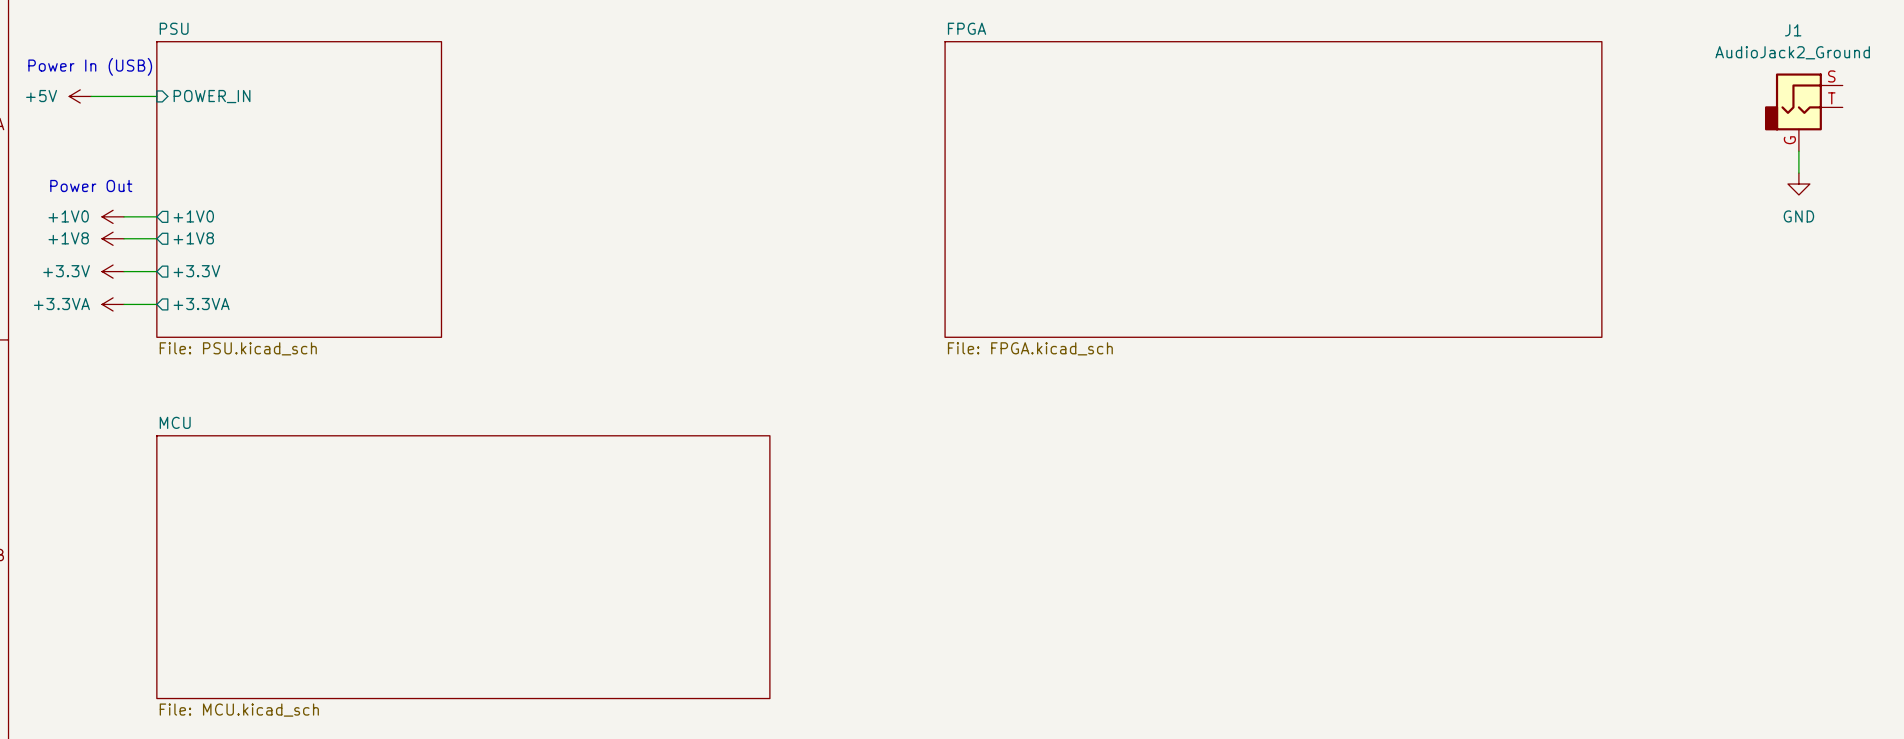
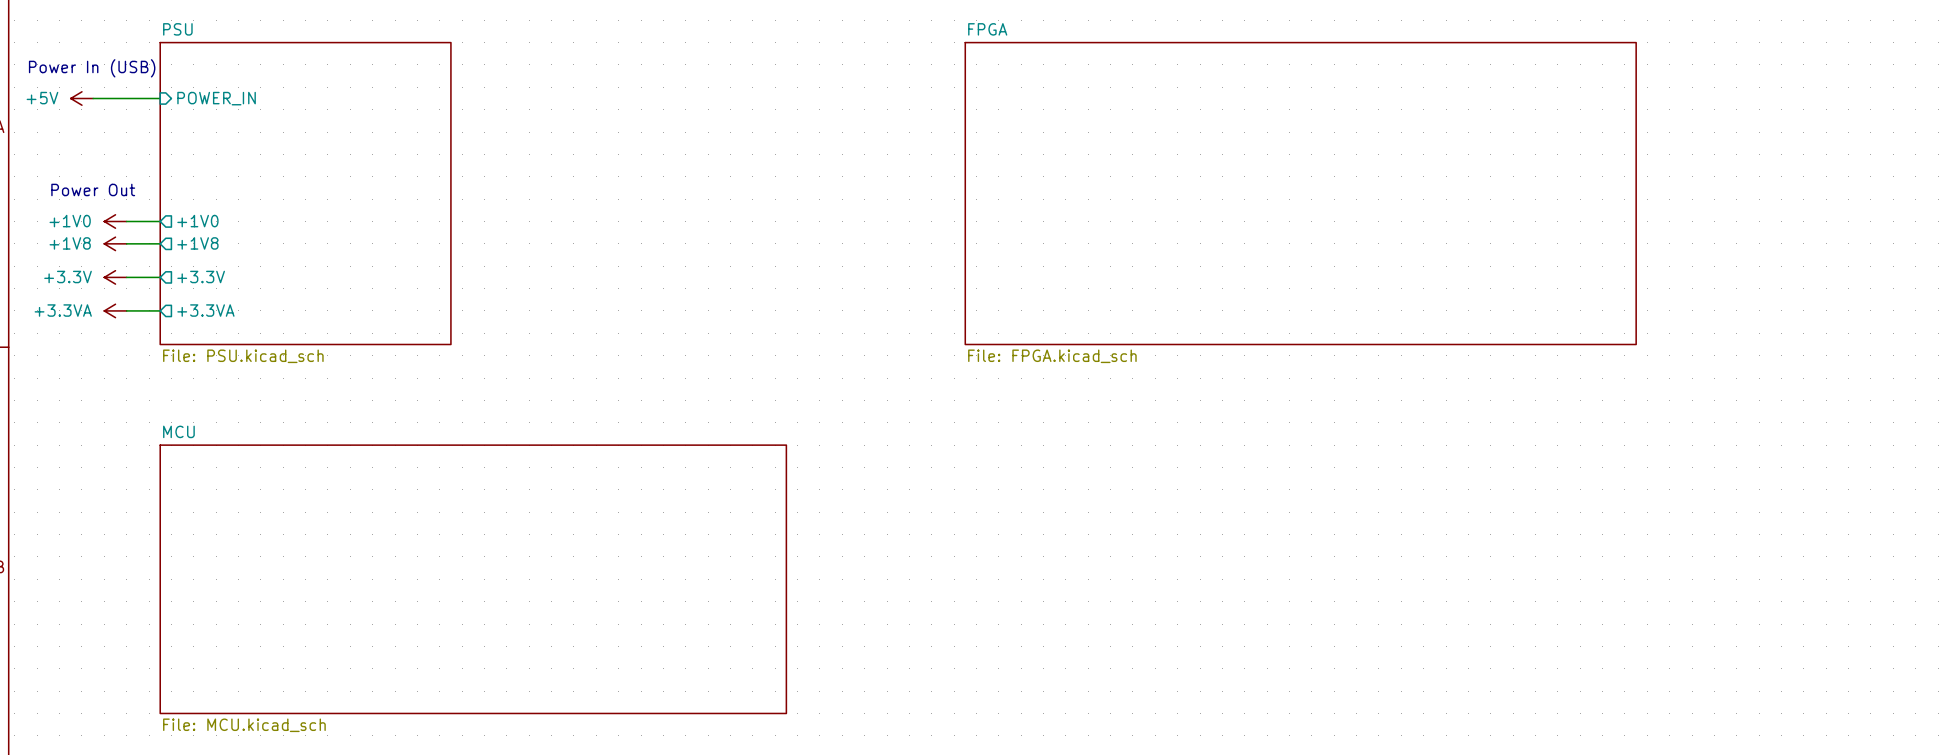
J1: AudioJack2_Ground (1803, 112) -> none
wire: (1798, 151) (1798, 173) -> none
power symbol: GND (1798, 184) -> none

